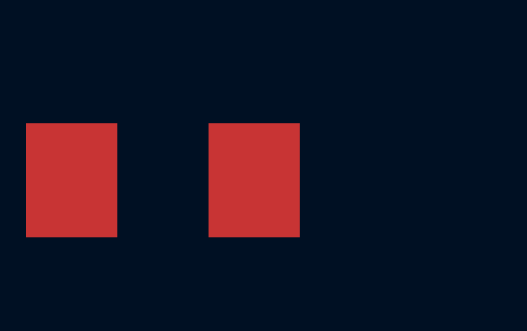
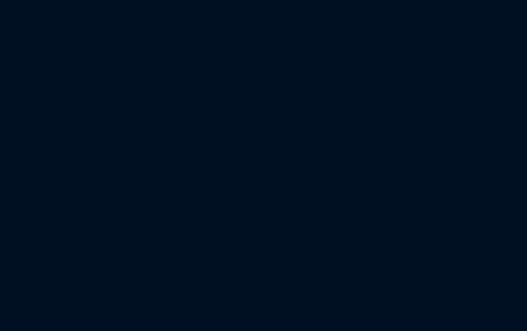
part: (162, 180) -> none

